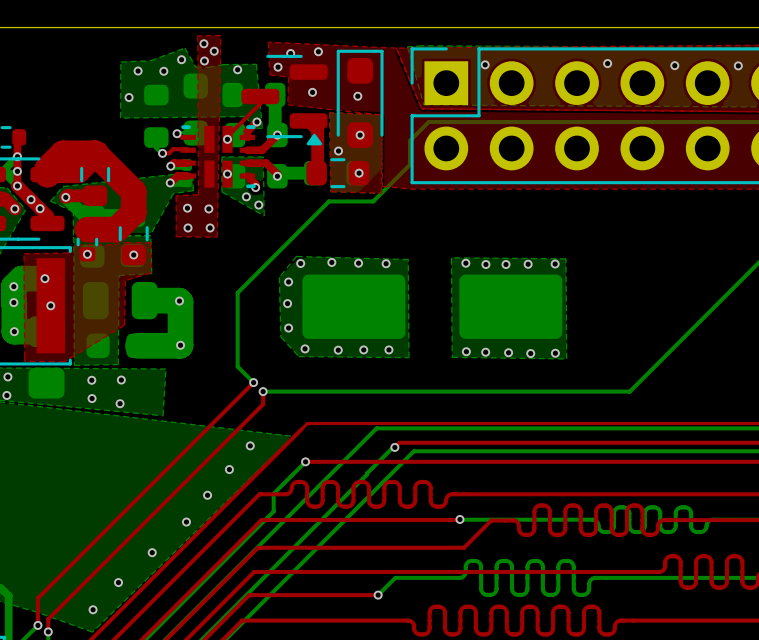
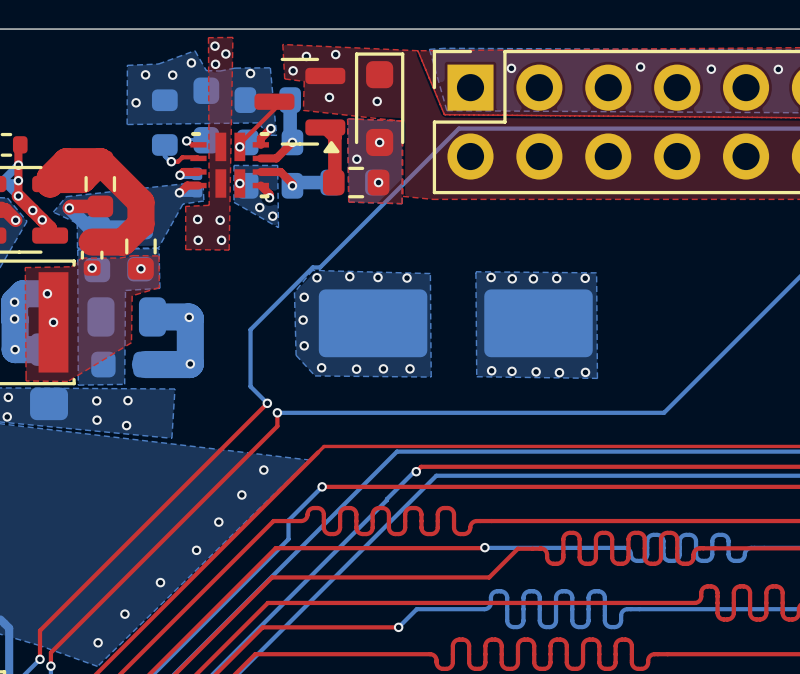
bottom track: (435, 121) (428, 121) (410, 140) (410, 164) (373, 201) (329, 201) (237, 292) (237, 312) -> (458, 128) (320, 267) (312, 267) (250, 329)

